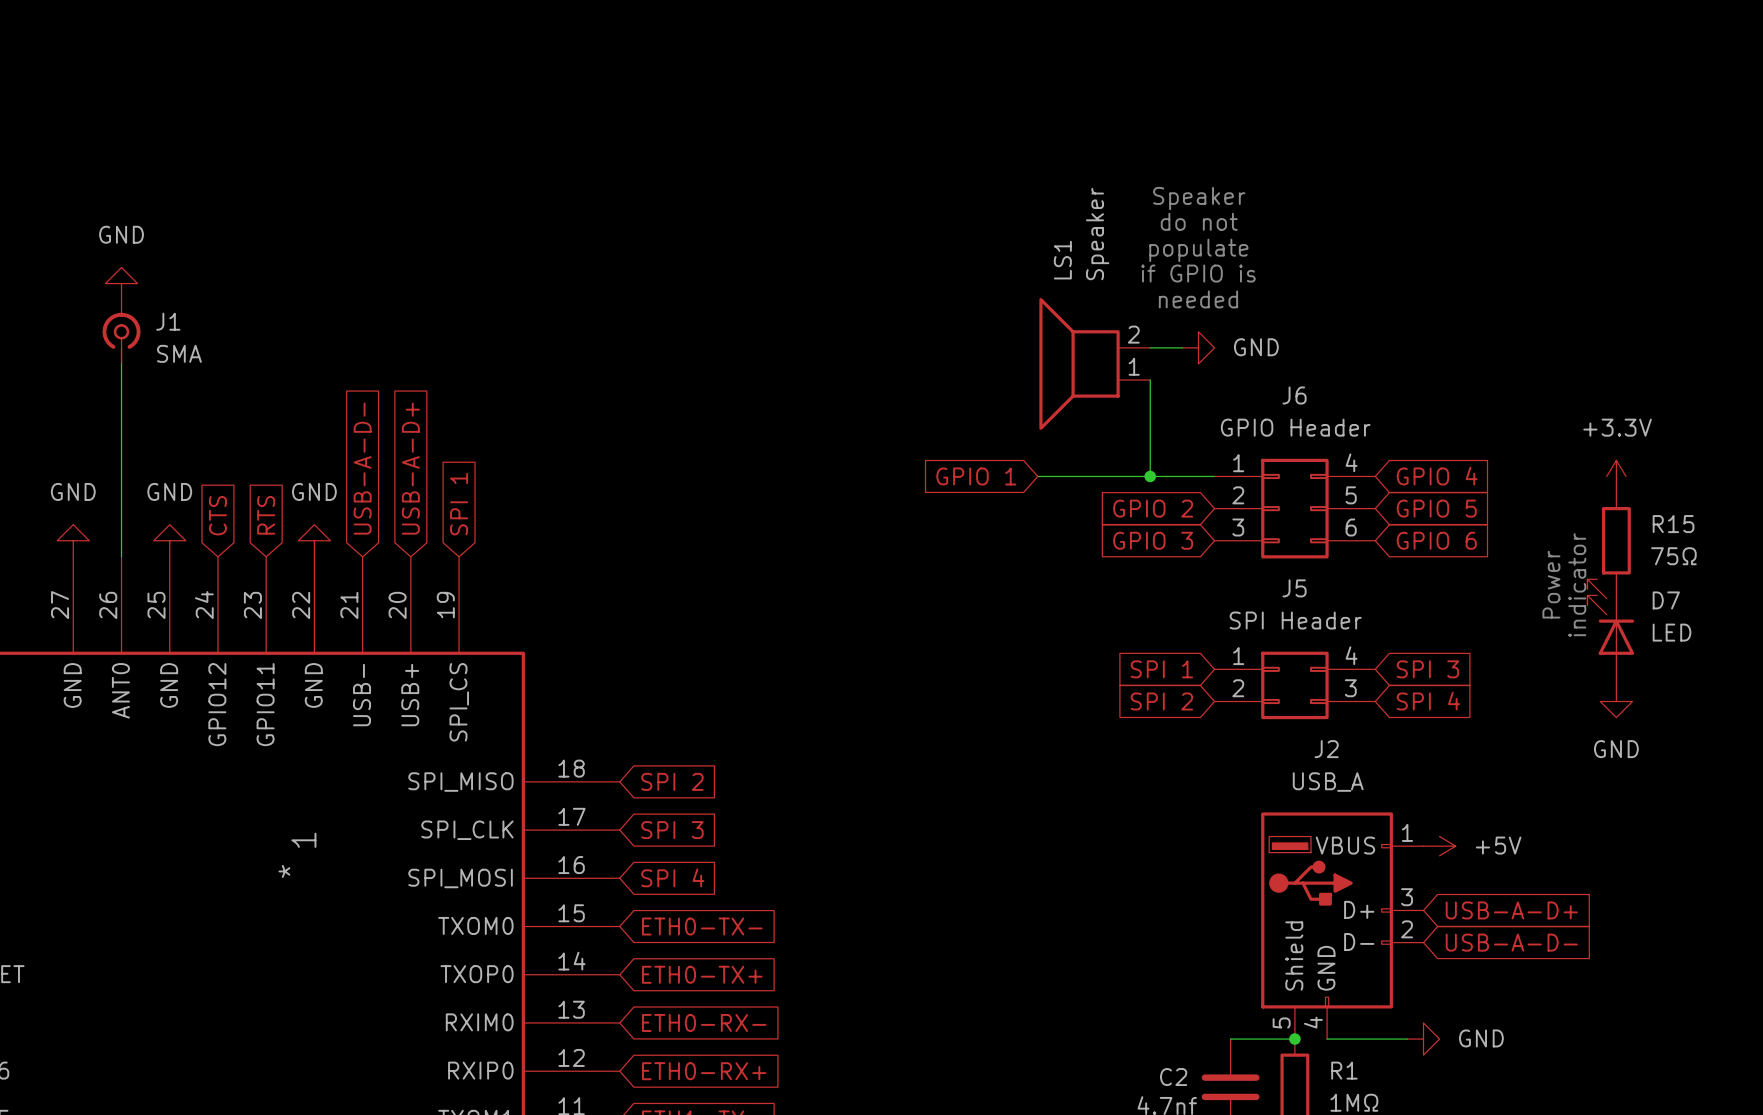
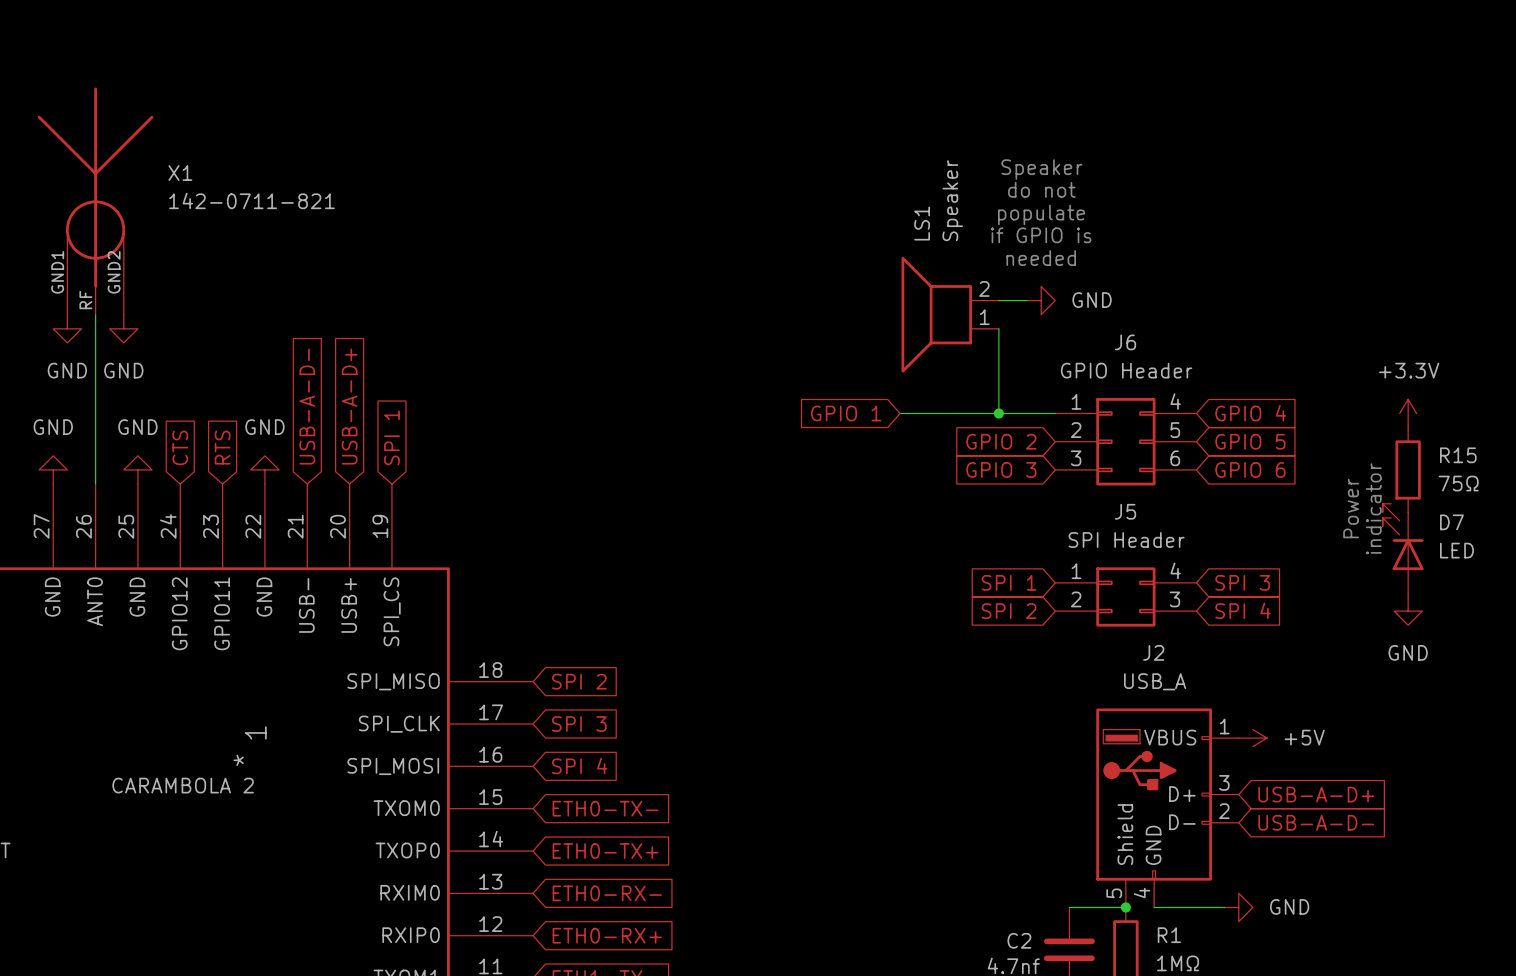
X1: none -> 142-0711-821 (95, 201)
power symbol: GND (121, 283) -> none
J1: SMA (121, 331) -> none
power symbol: none -> GND (67, 328)
power symbol: none -> GND (123, 328)
1 text: none -> CARAMBOLA 2 (183, 785)

